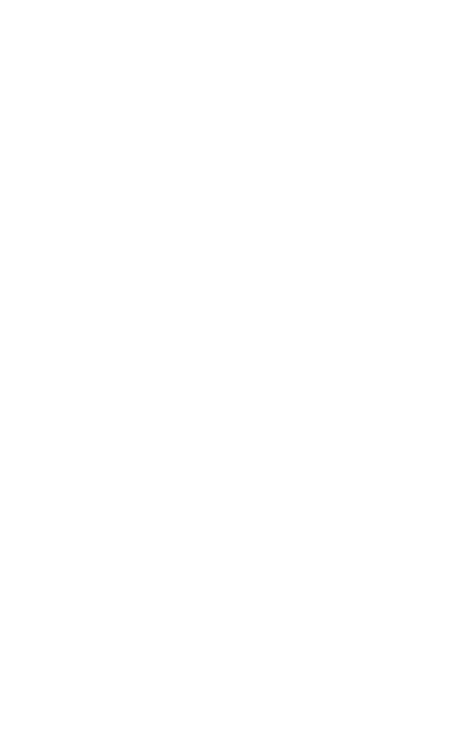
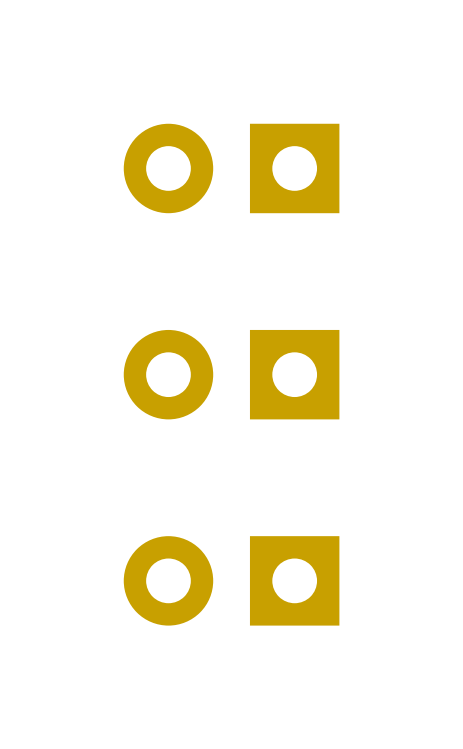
part: none -> (231, 168)
part: none -> (231, 374)
part: none -> (231, 580)

